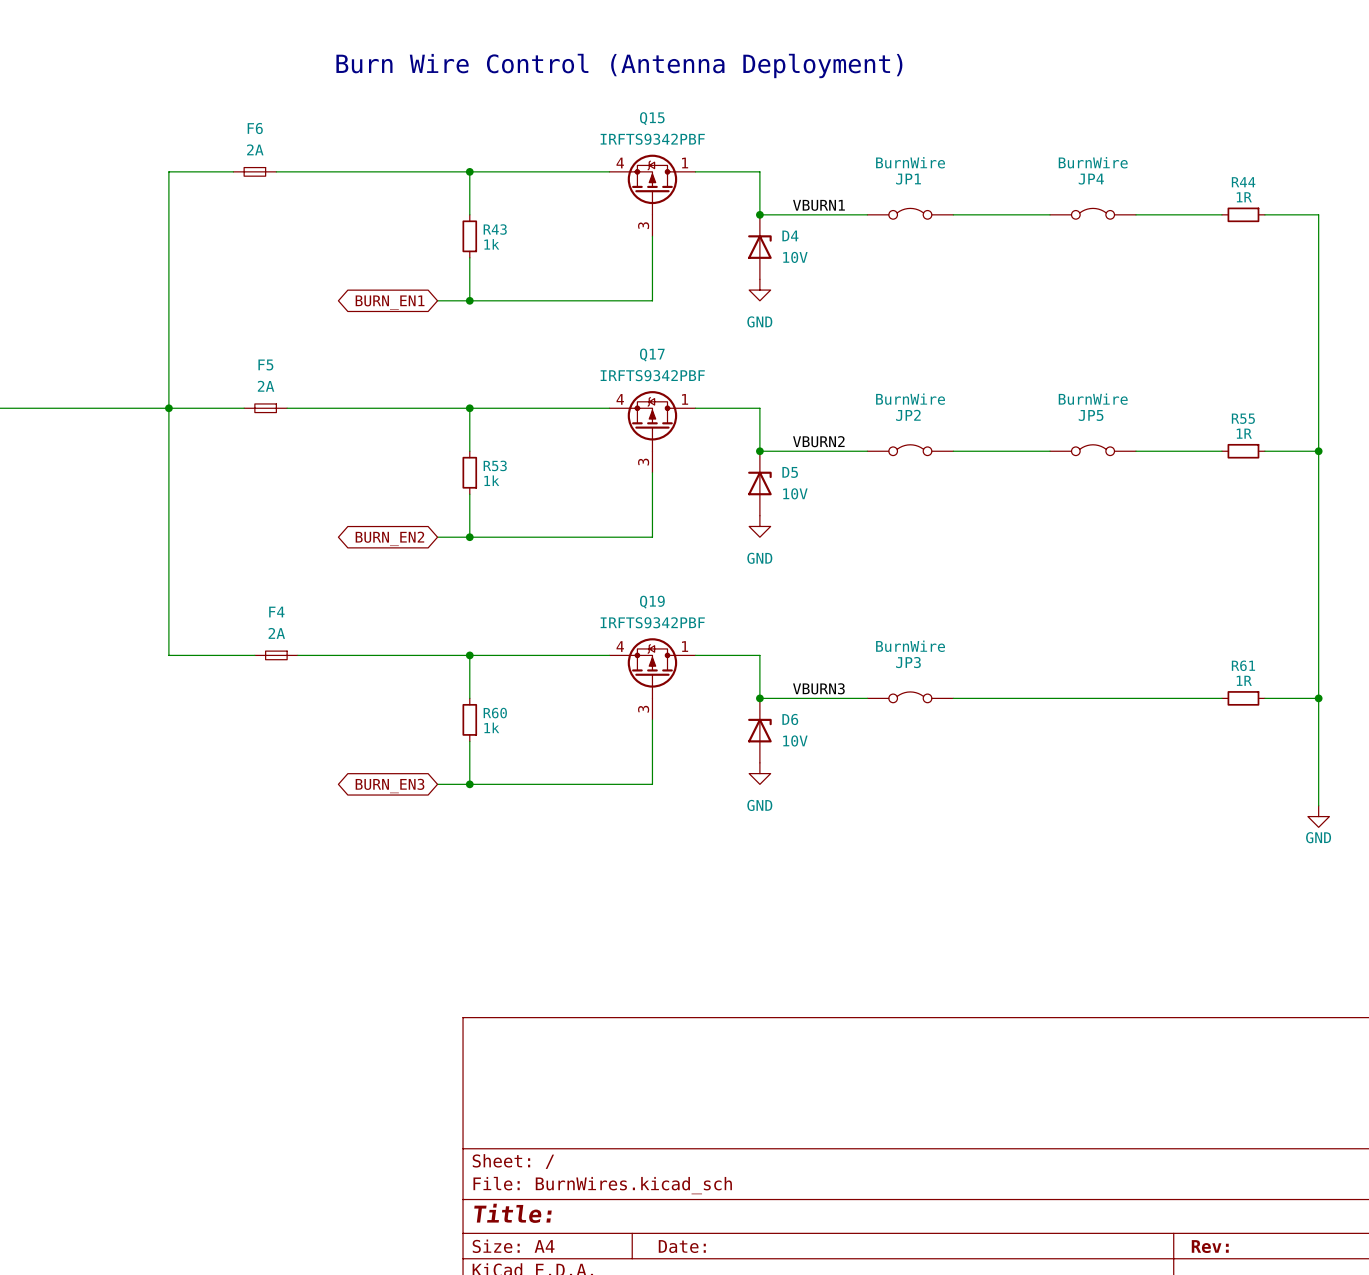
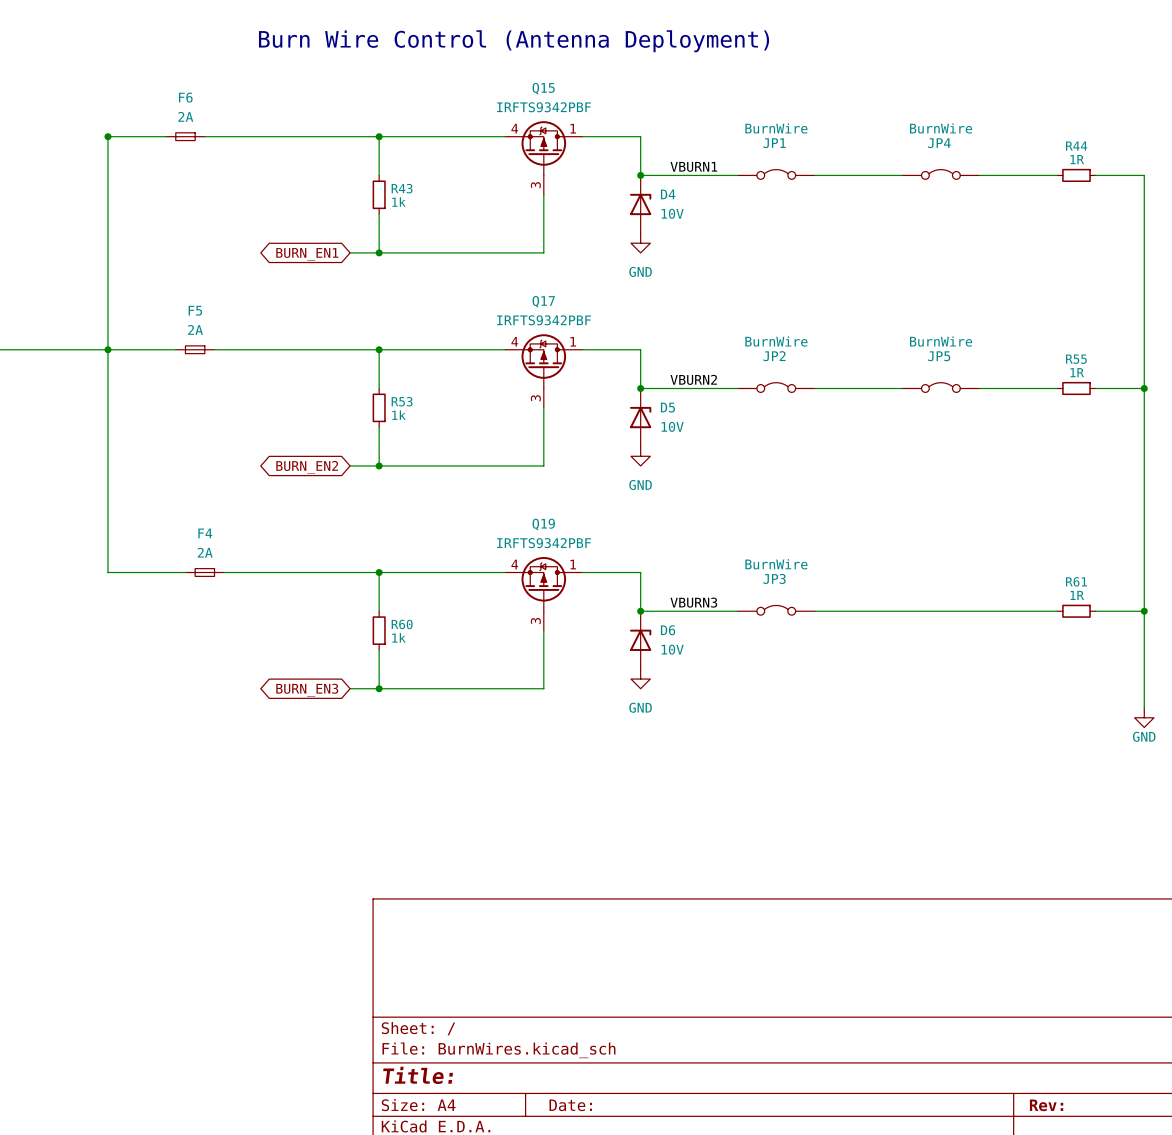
junction: none -> (107, 136)

